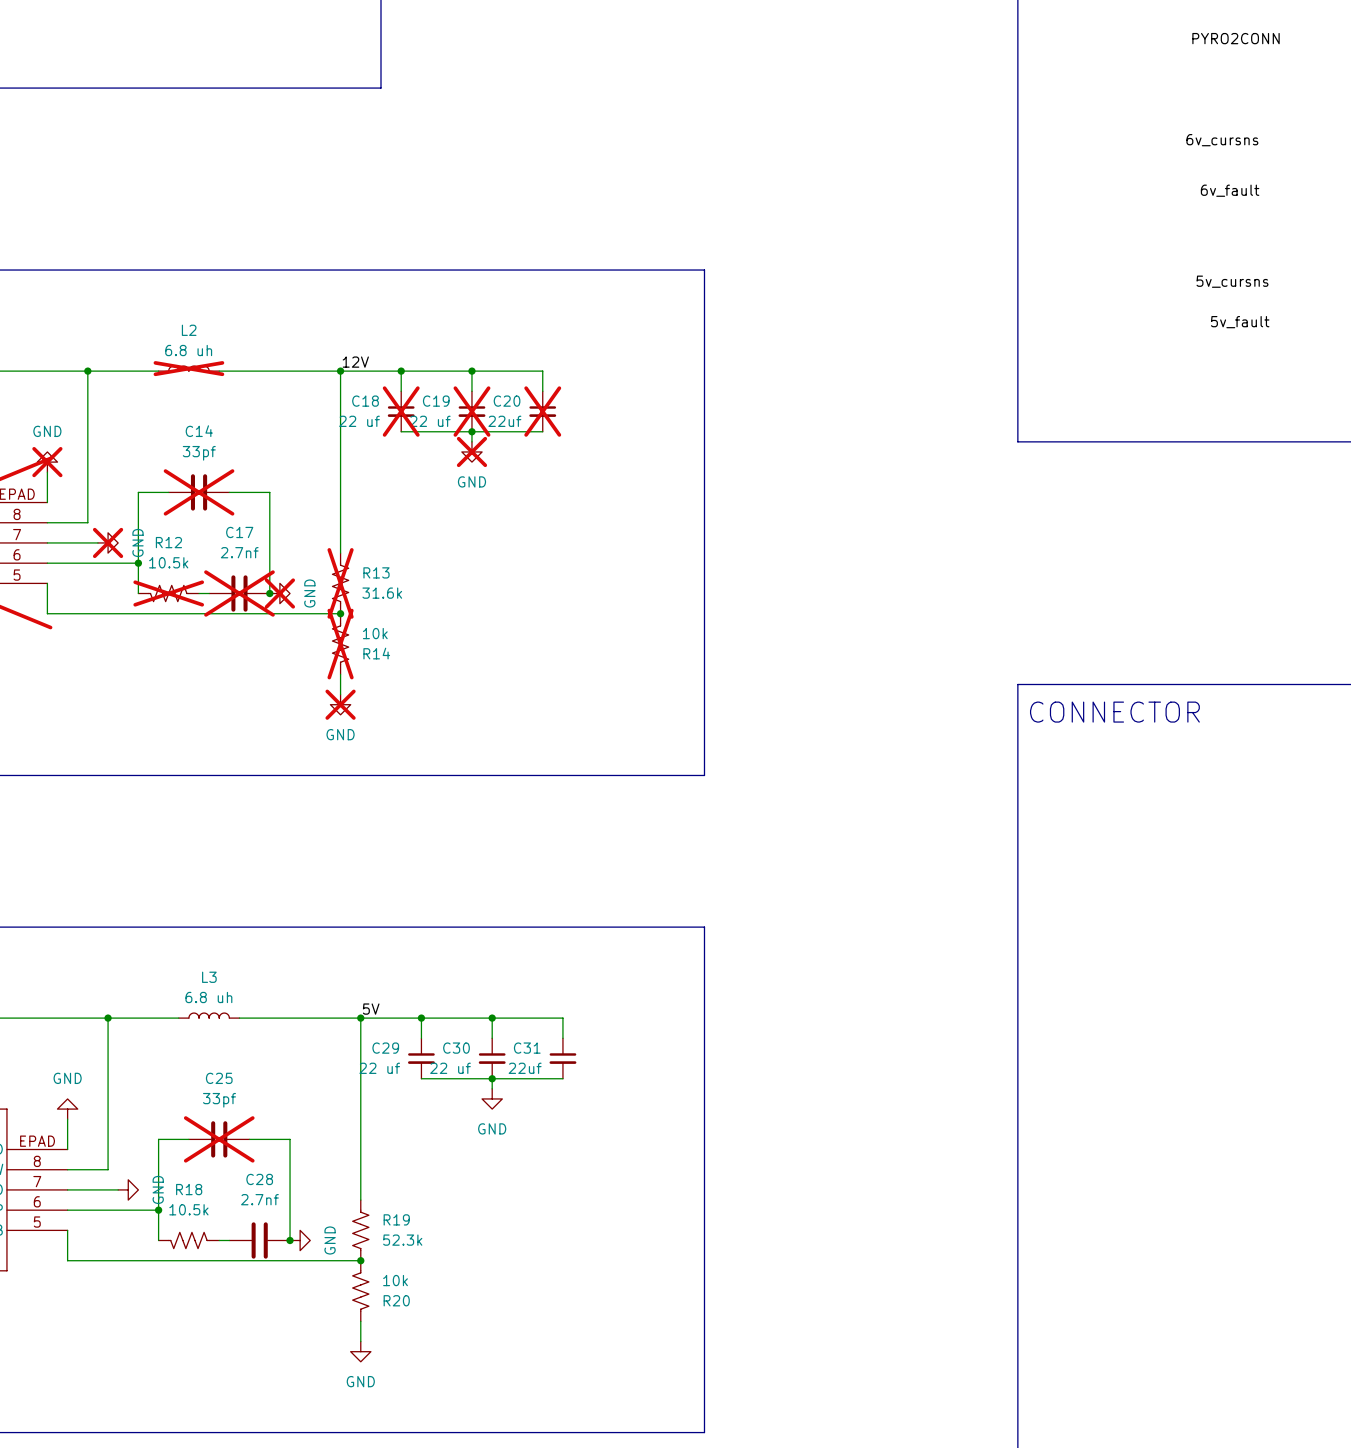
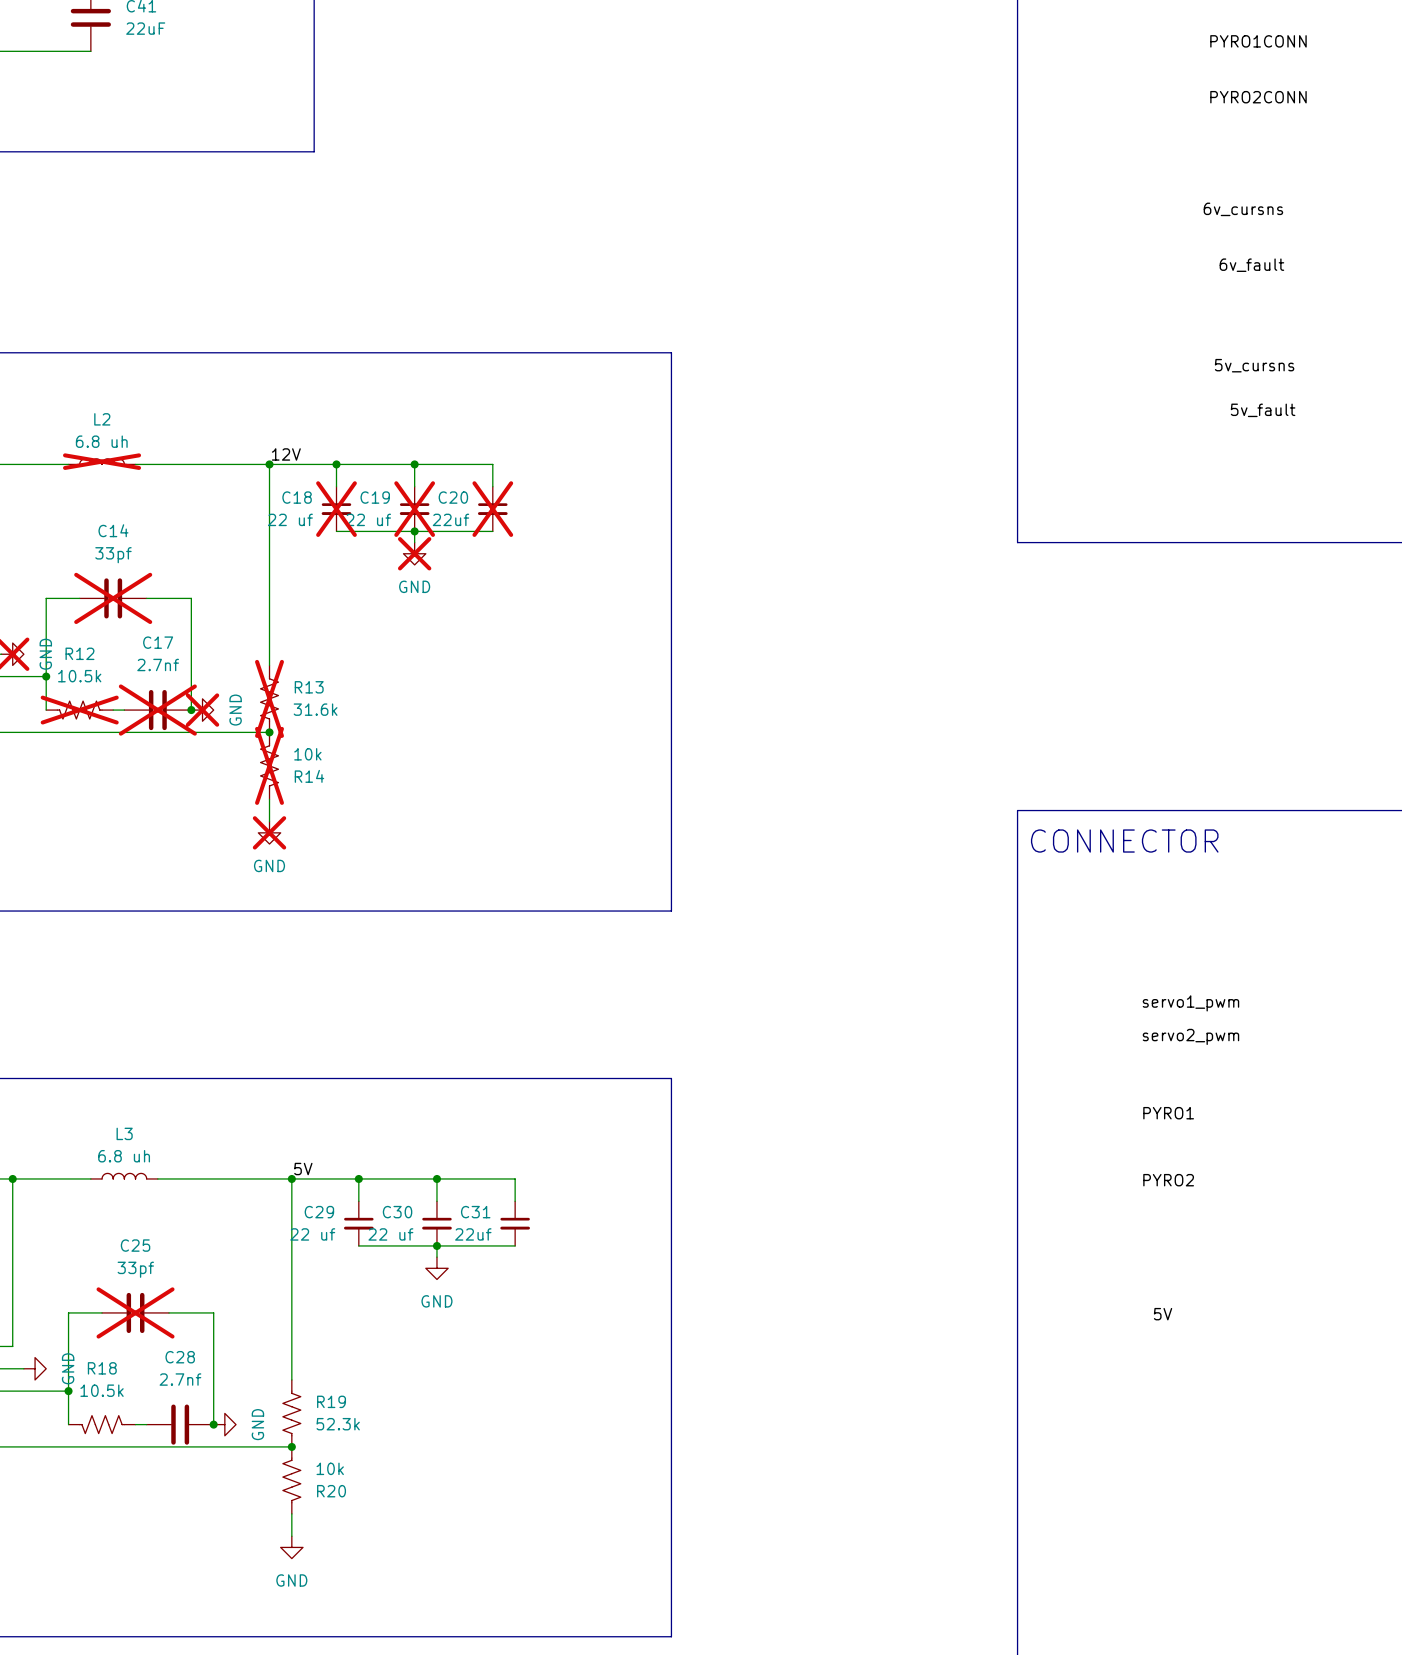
label: none -> servo1_pwm (1190, 1003)
label: none -> servo2_pwm (1190, 1036)
label: none -> PYRO1 (1168, 1113)
label: none -> PYRO2 (1168, 1180)
label: none -> 5V (1163, 1314)

